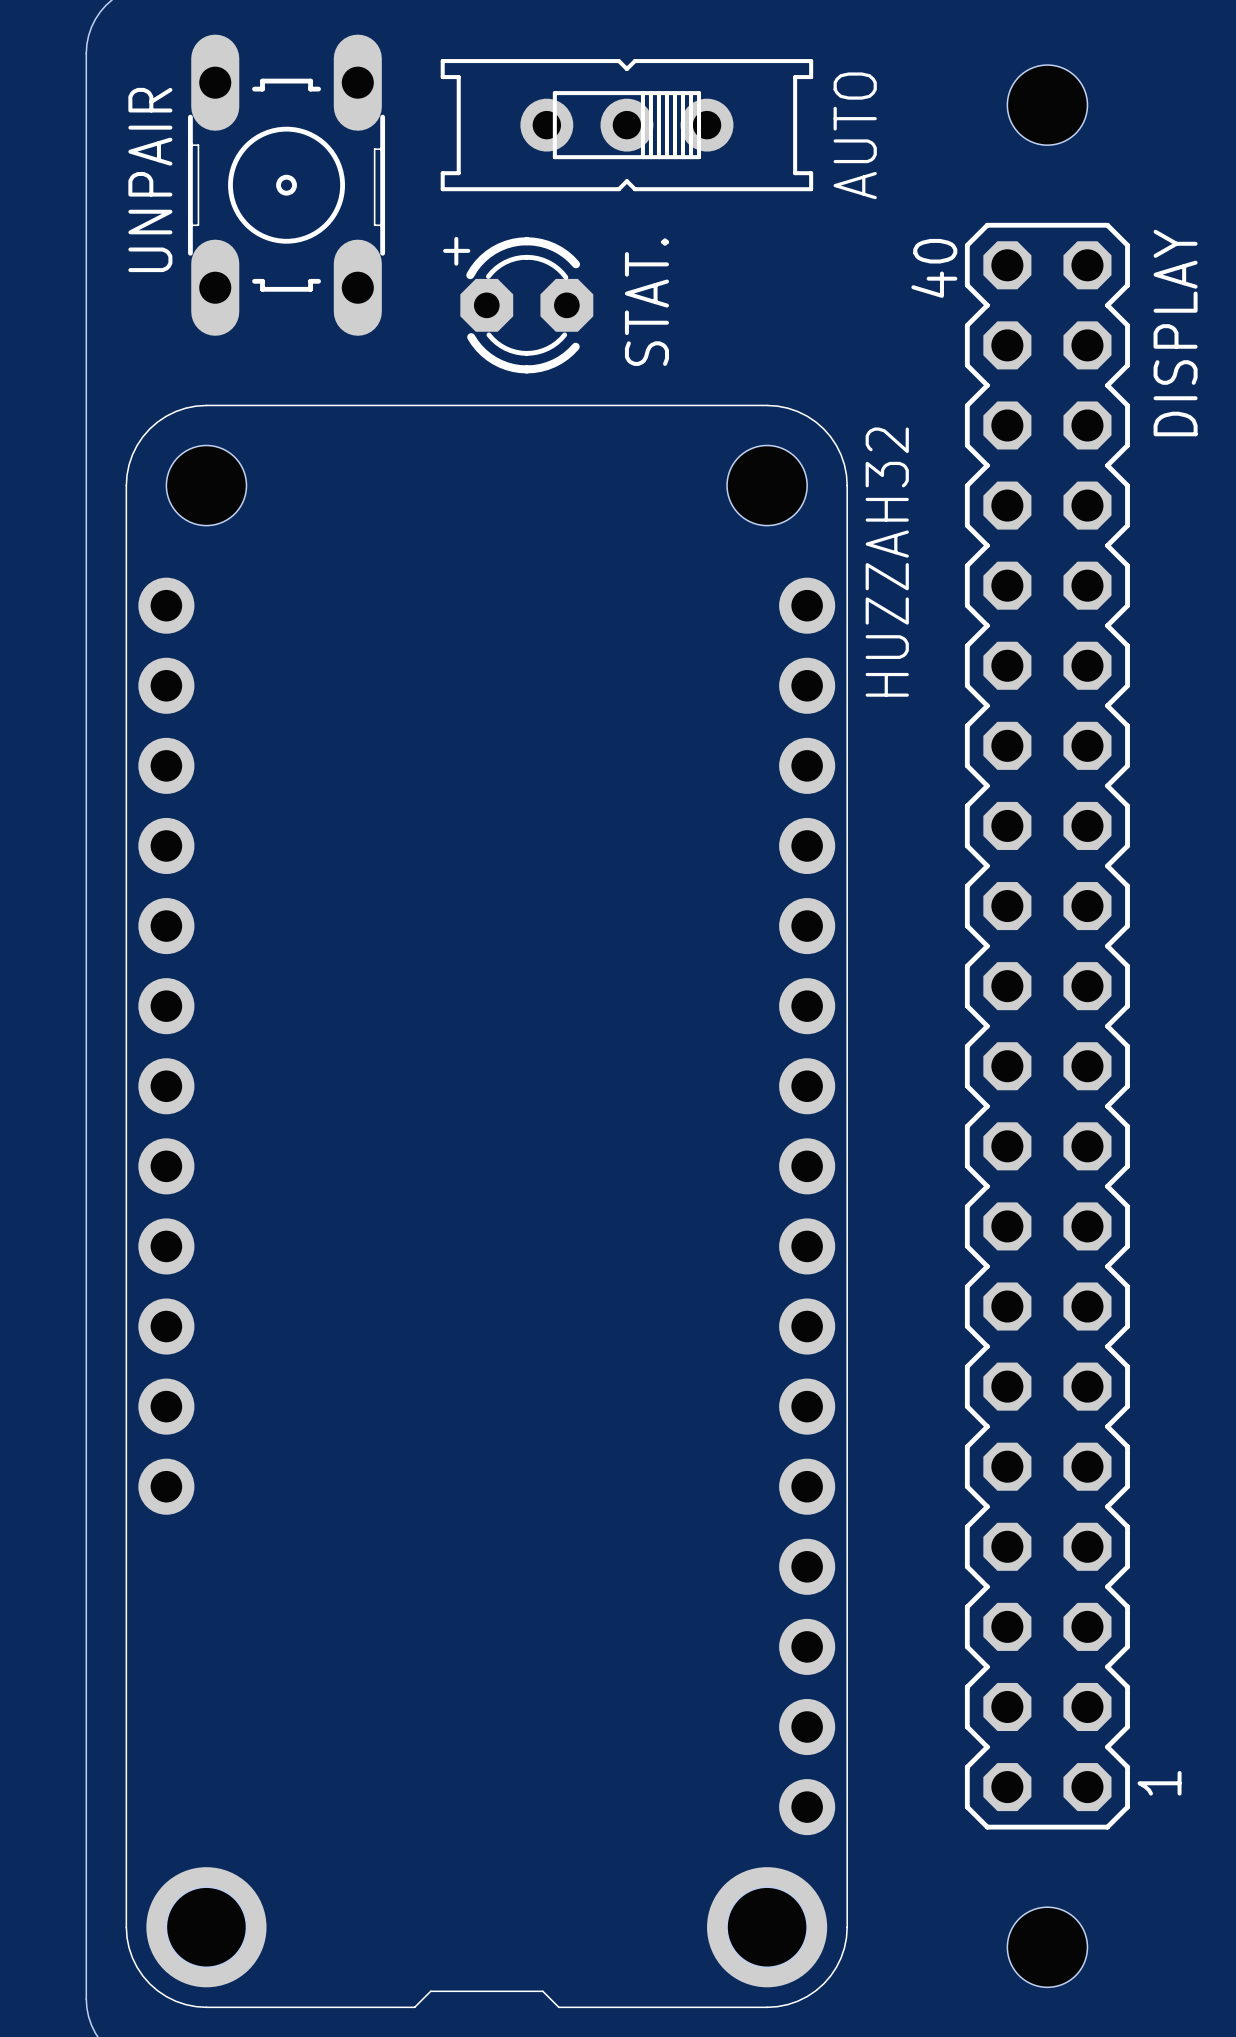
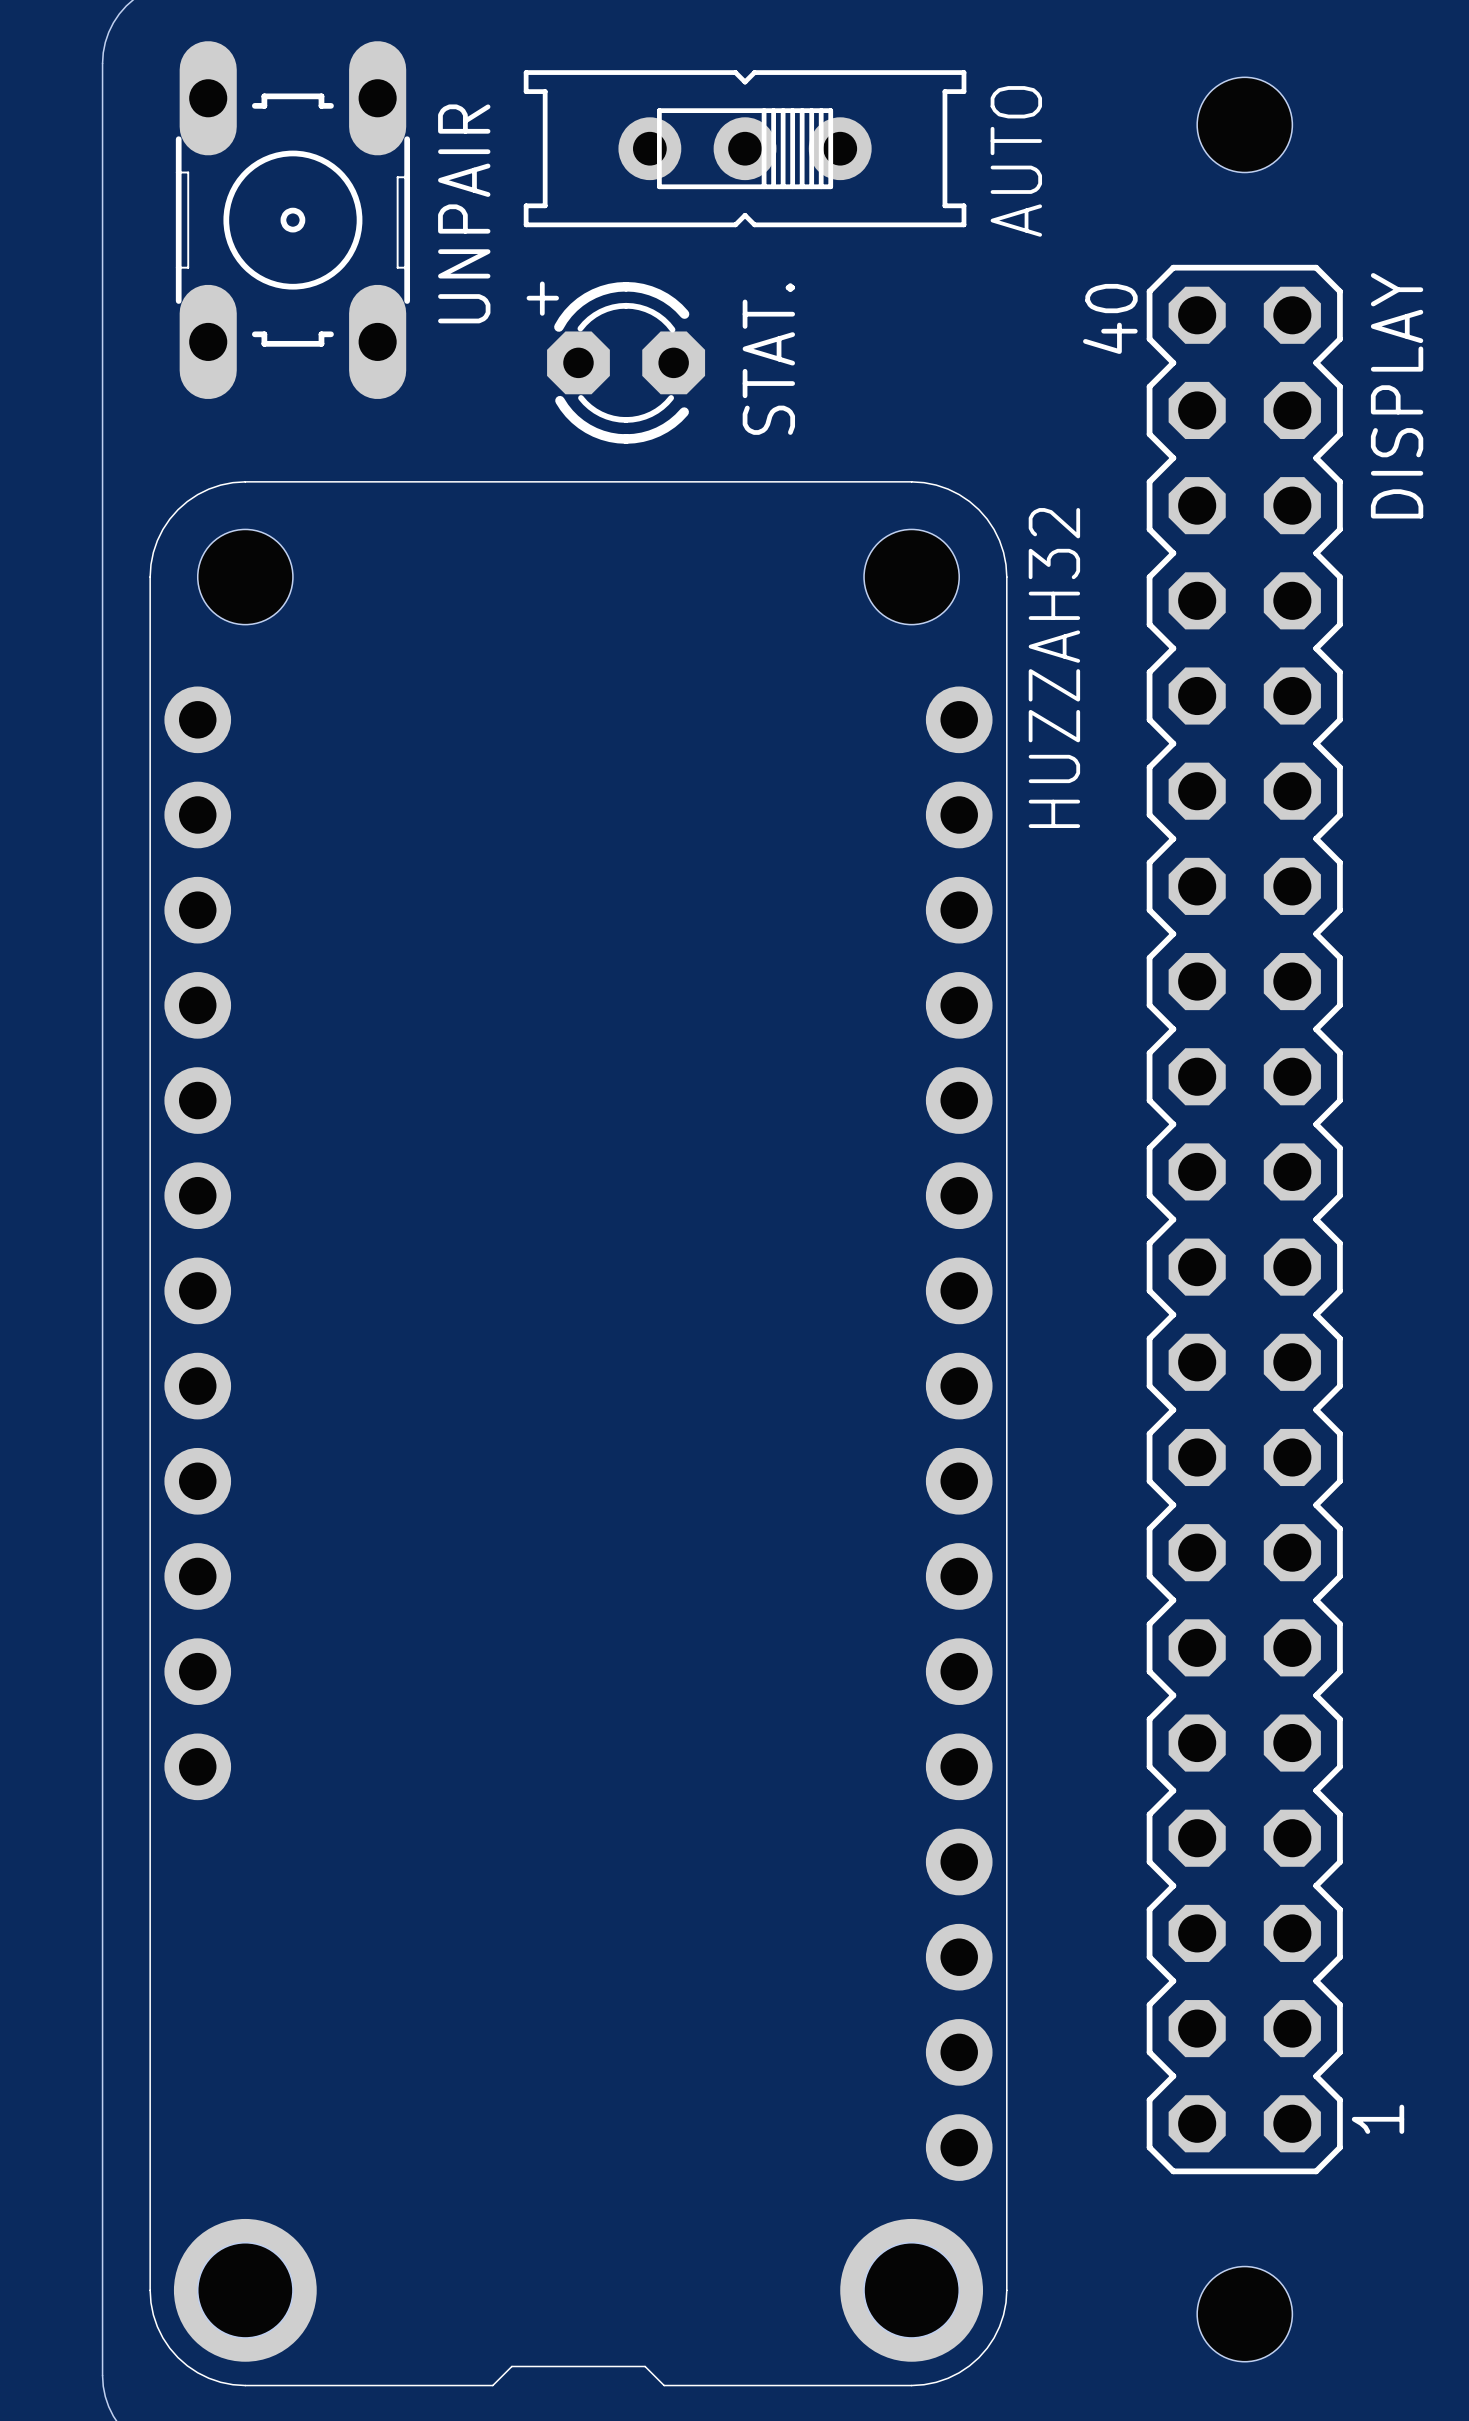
UNPAIR name position: UNPAIR (150, 179) -> UNPAIR (464, 213)
UNPAIR position: (286, 185) -> (292, 220)

